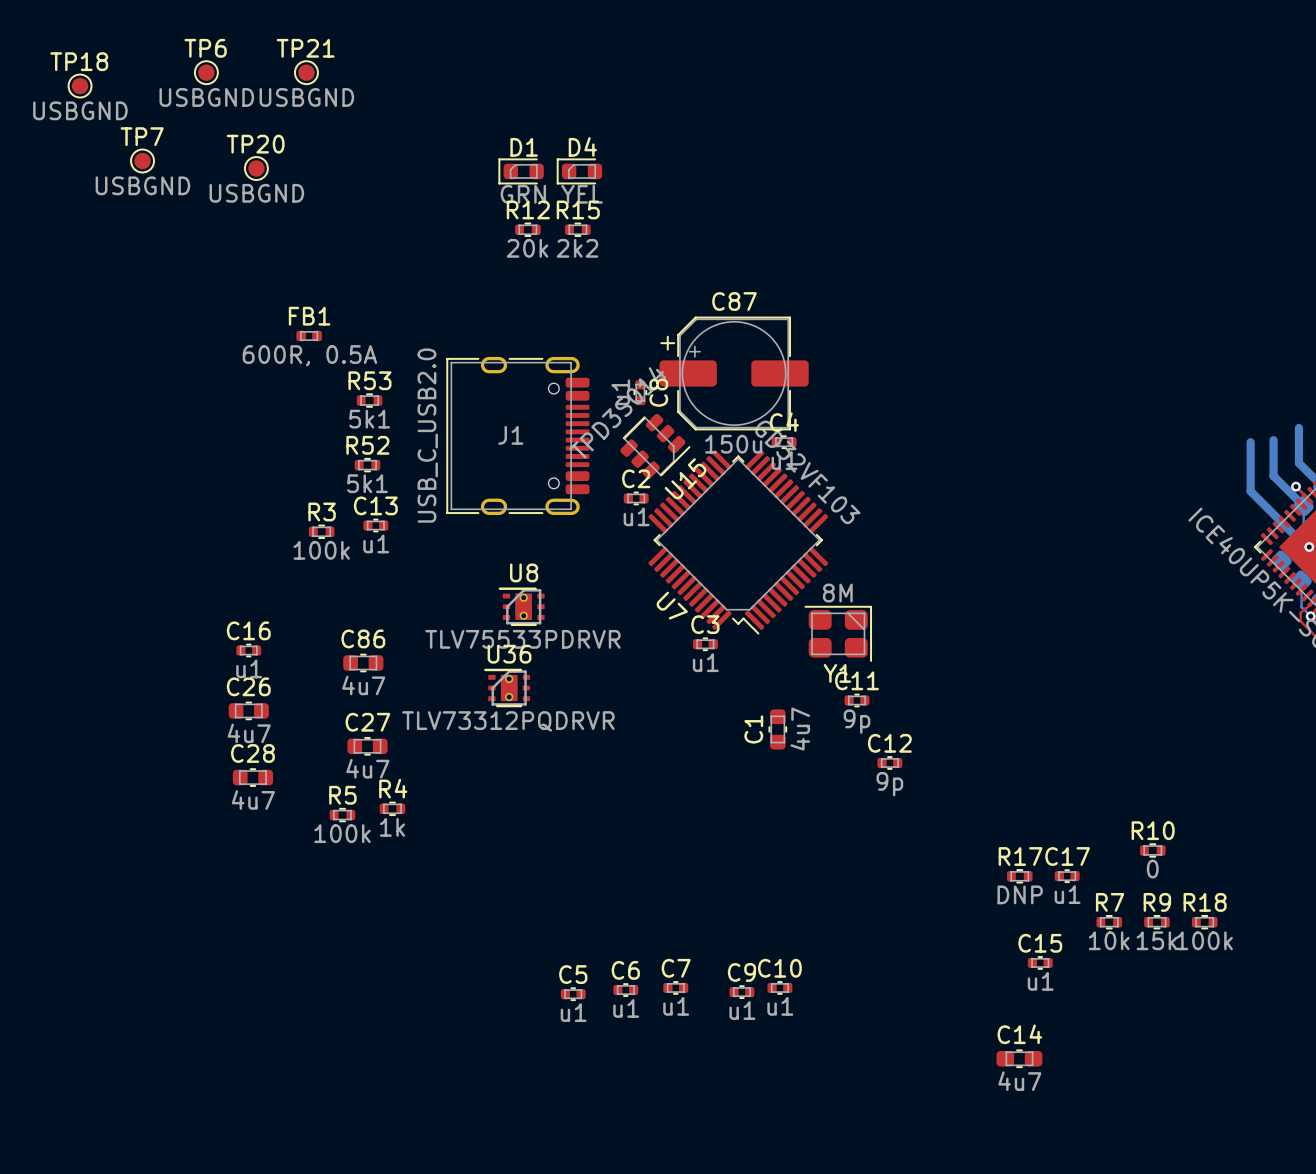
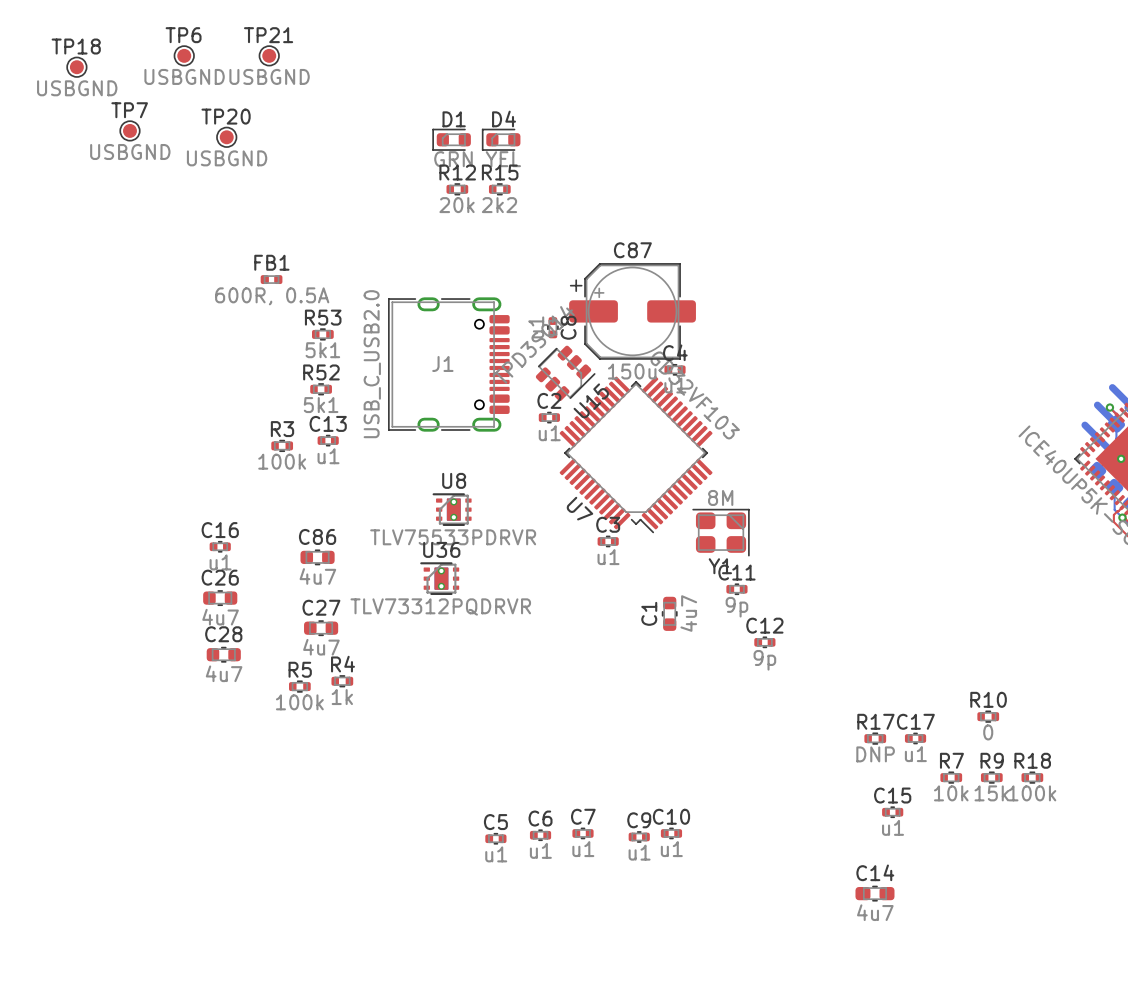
bottom track: (1298, 428) (1298, 463) -> none
bottom track: (1273, 440) (1273, 475) (1281, 483) -> none
bottom track: (1250, 442) (1250, 491) (1266, 507) -> none

